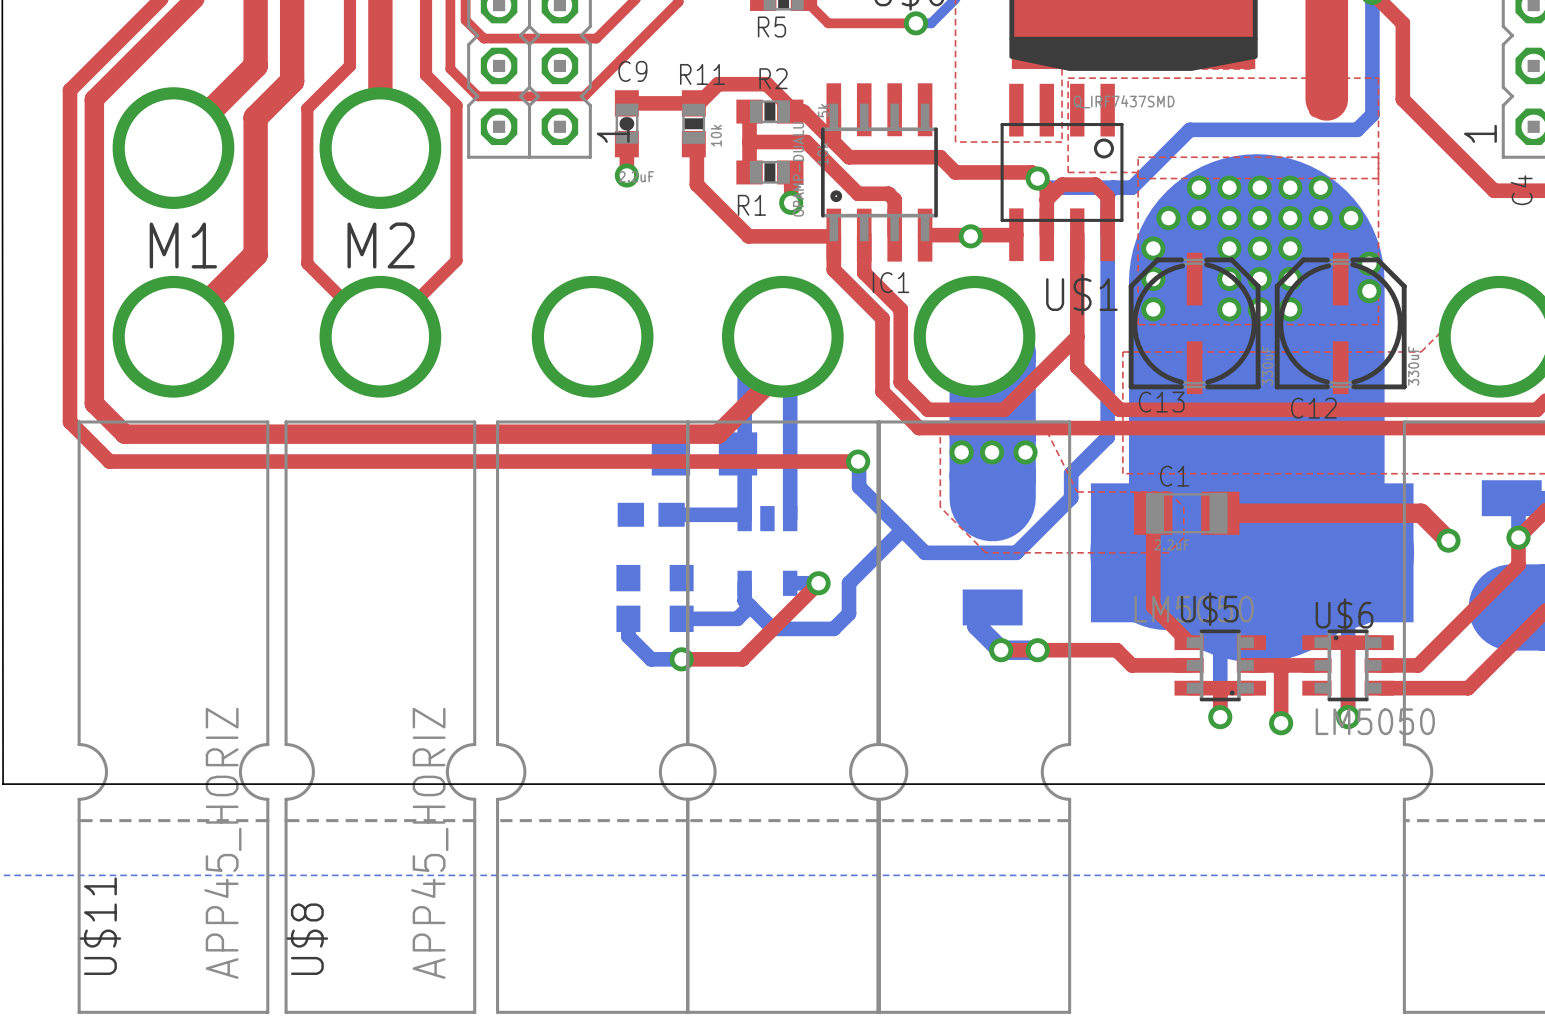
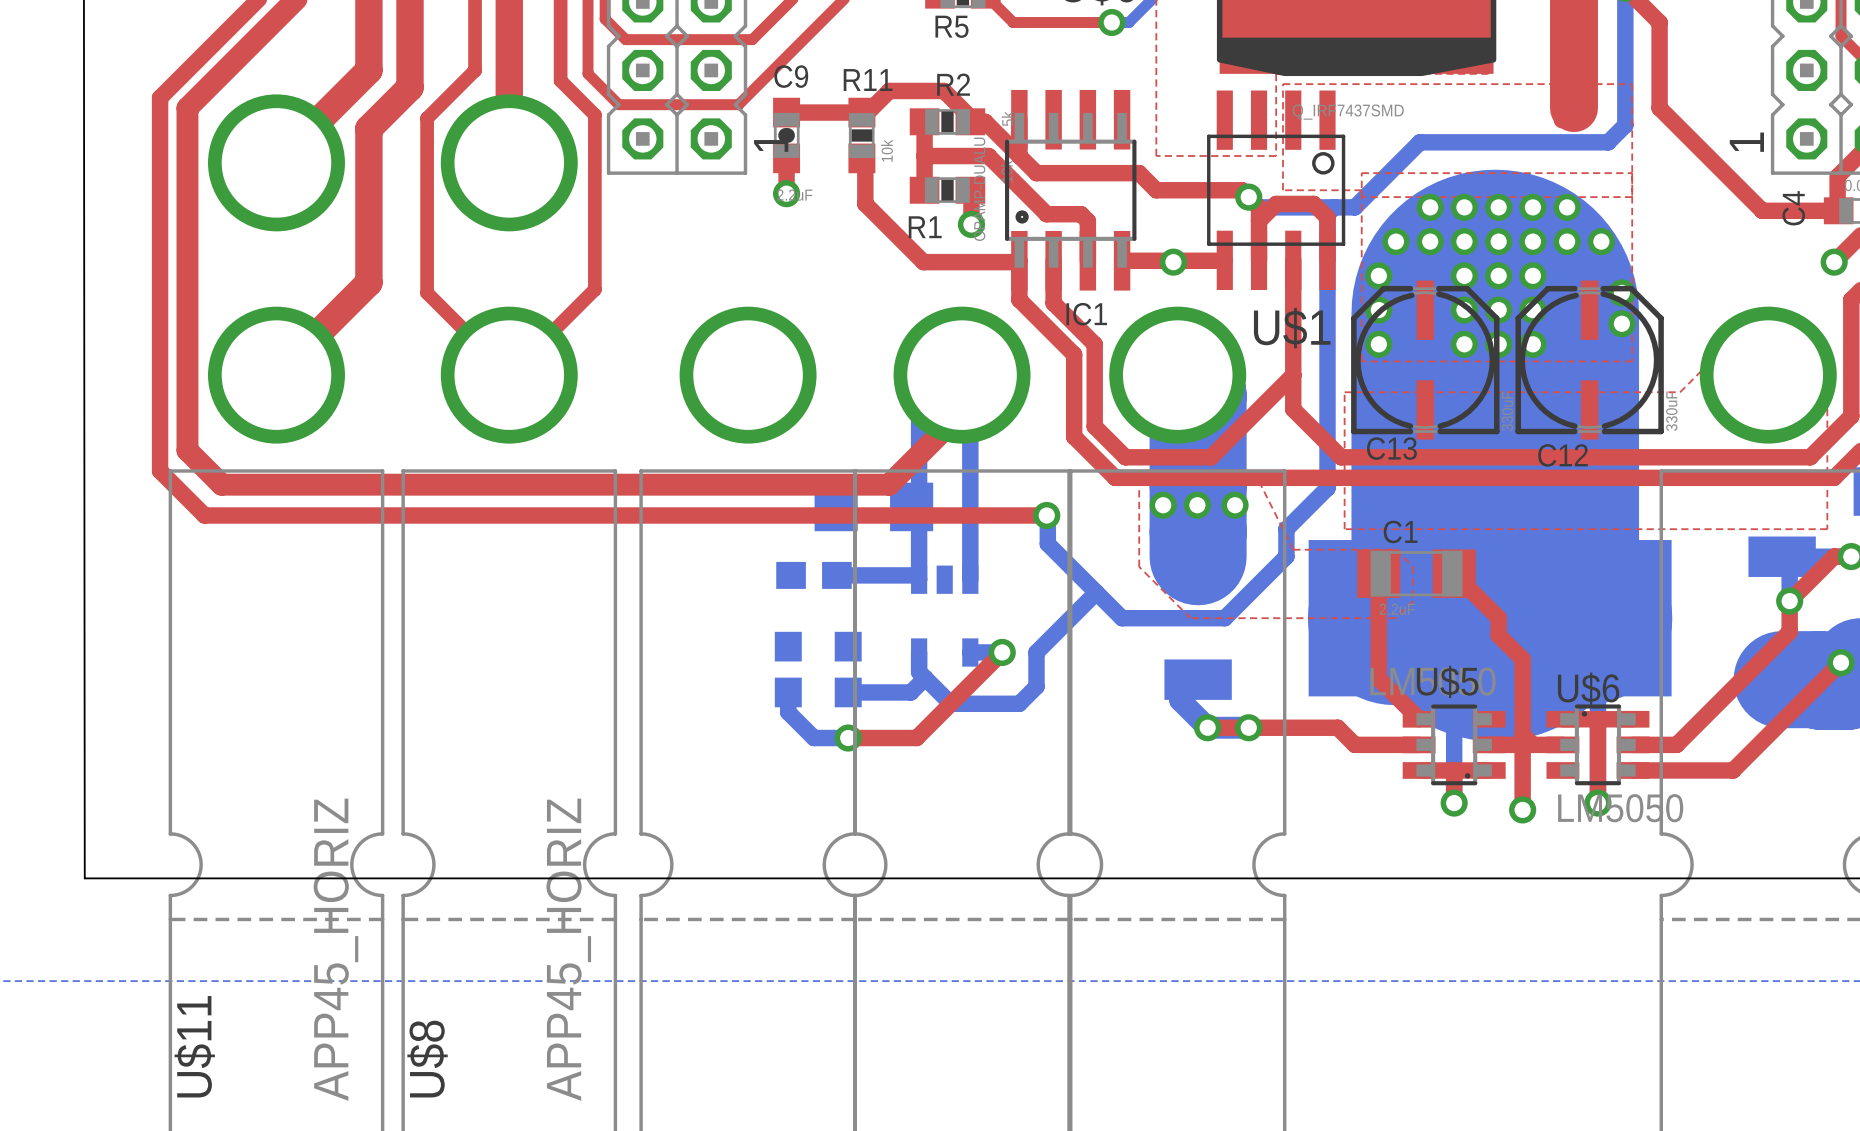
text: M1 (183, 245) -> none
text: M2 (381, 245) -> none
top track: (1220, 513) (1421, 513) (1448, 540) -> (1454, 573) (1498, 618) (1498, 635) (1522, 659) (1522, 734) (1532, 744)
via: (1448, 540) -> none

